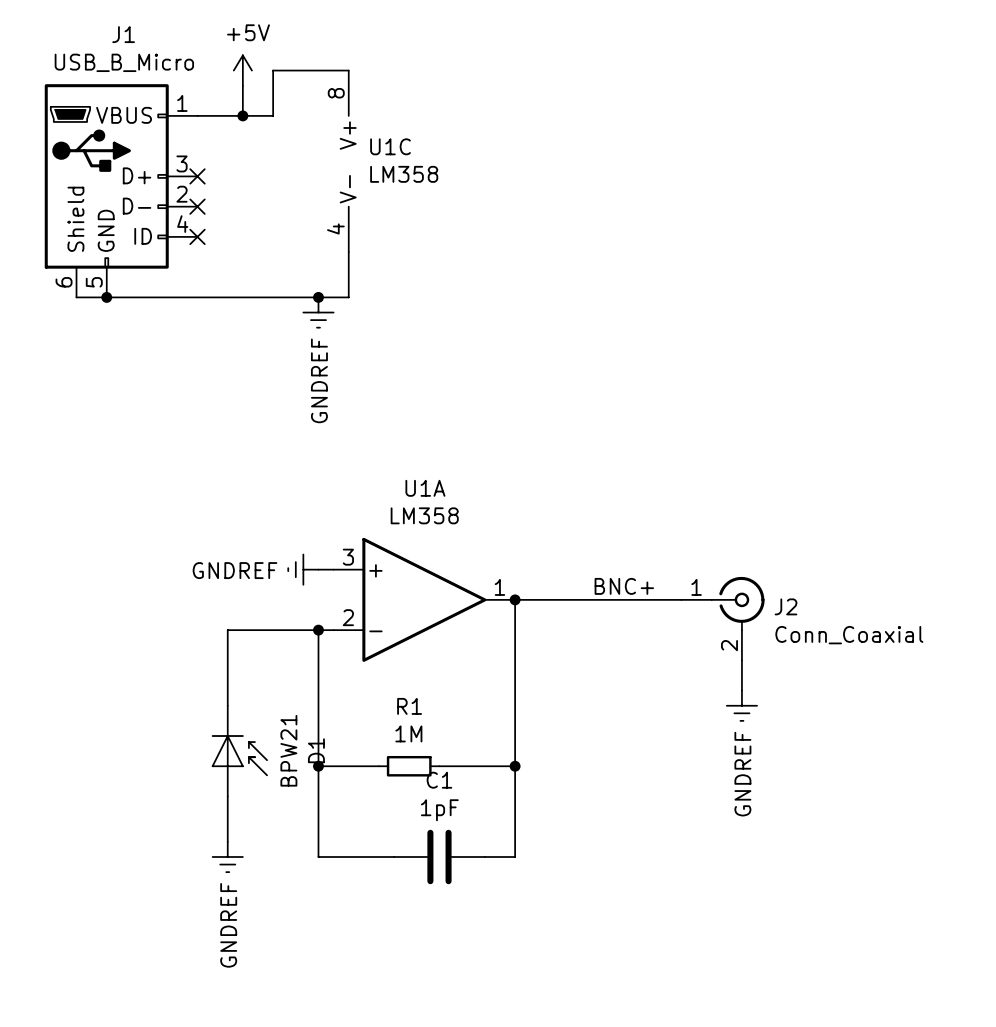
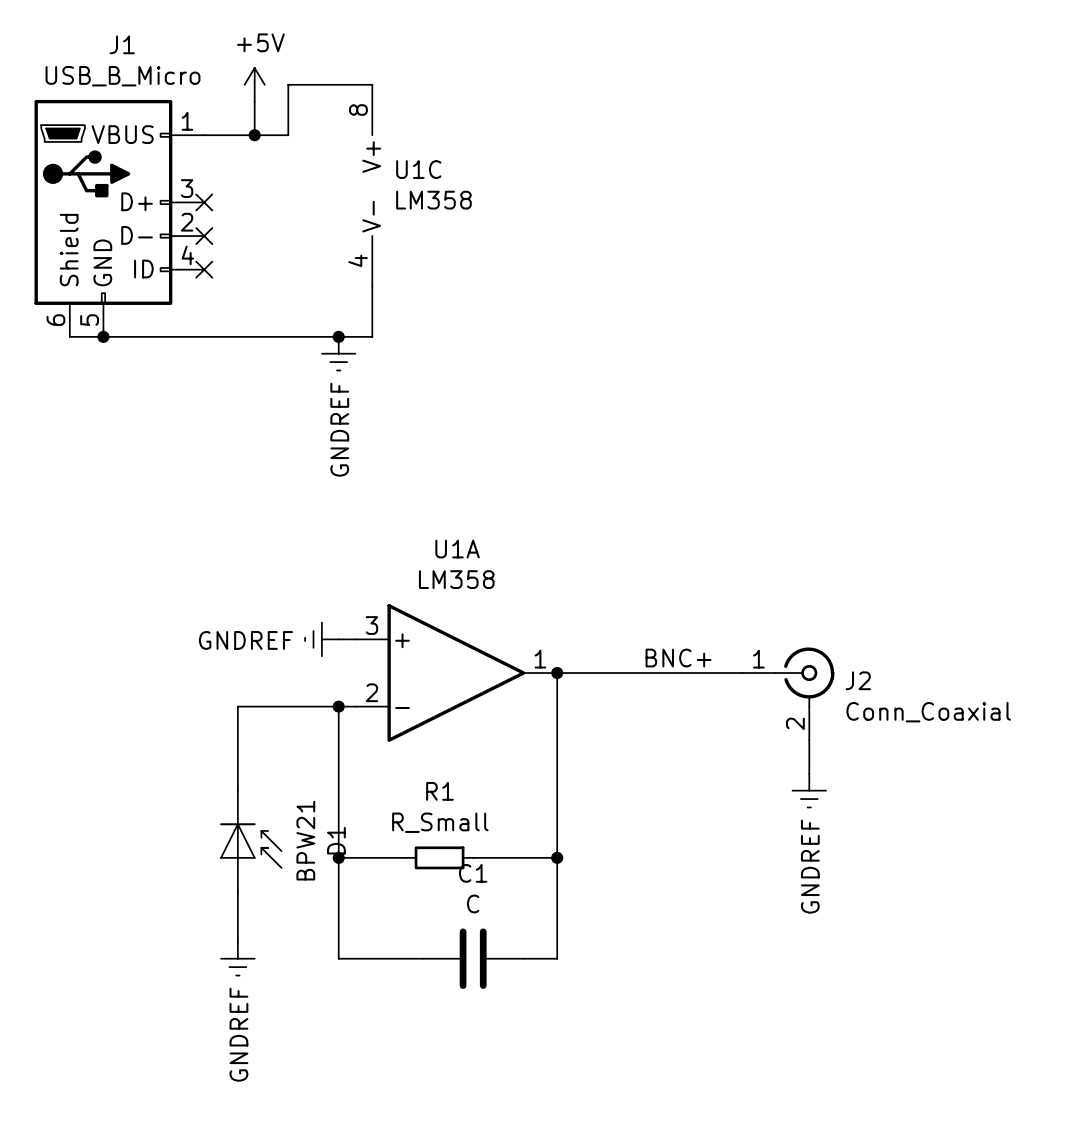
R1 value: 1M (408, 733) -> R_Small (440, 822)
C1 value: 1pF (439, 810) -> C (473, 903)

